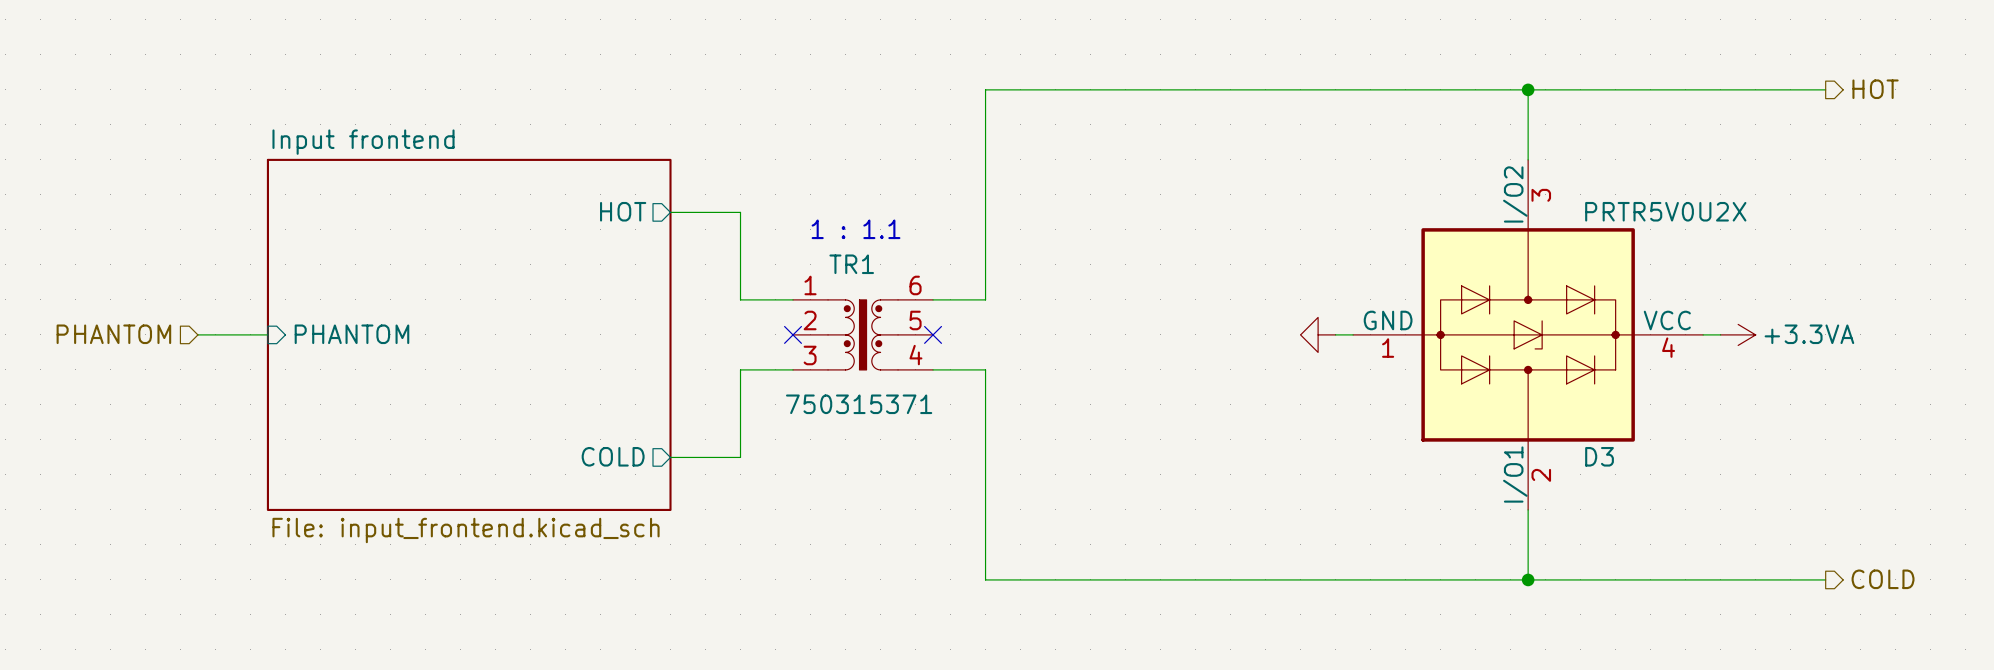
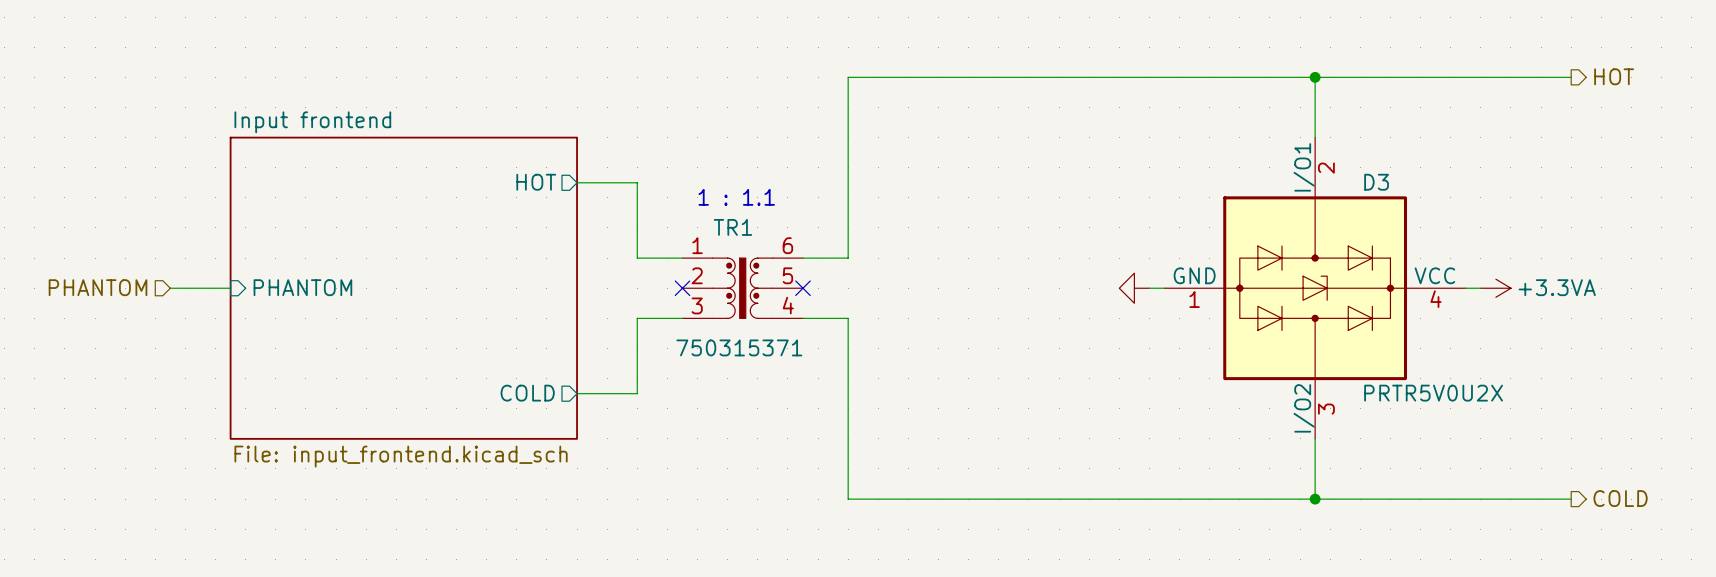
D3 flip: as is (1528, 334) -> up-down (1315, 288)

